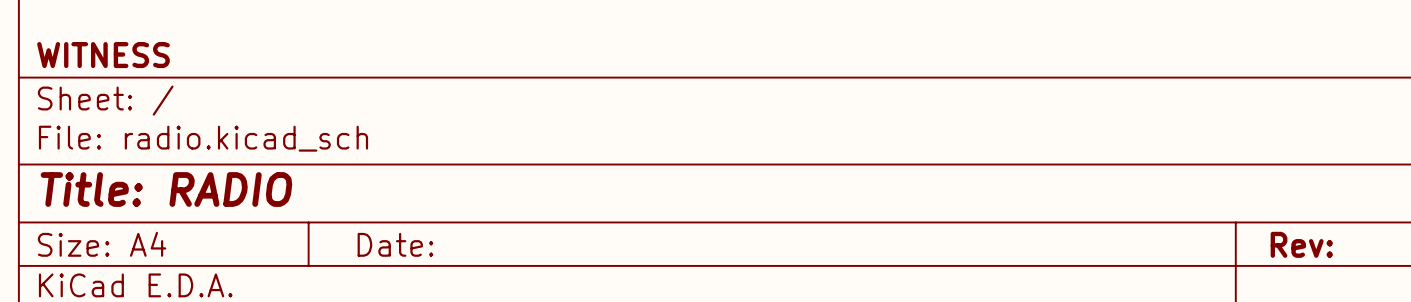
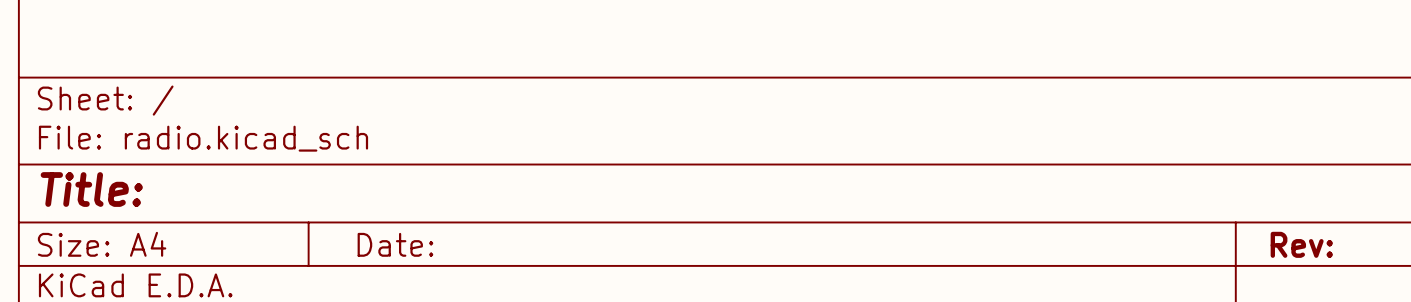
title block: WITNESS (103, 55) -> none
title block: Title: RADIO (166, 189) -> Title: (91, 189)

